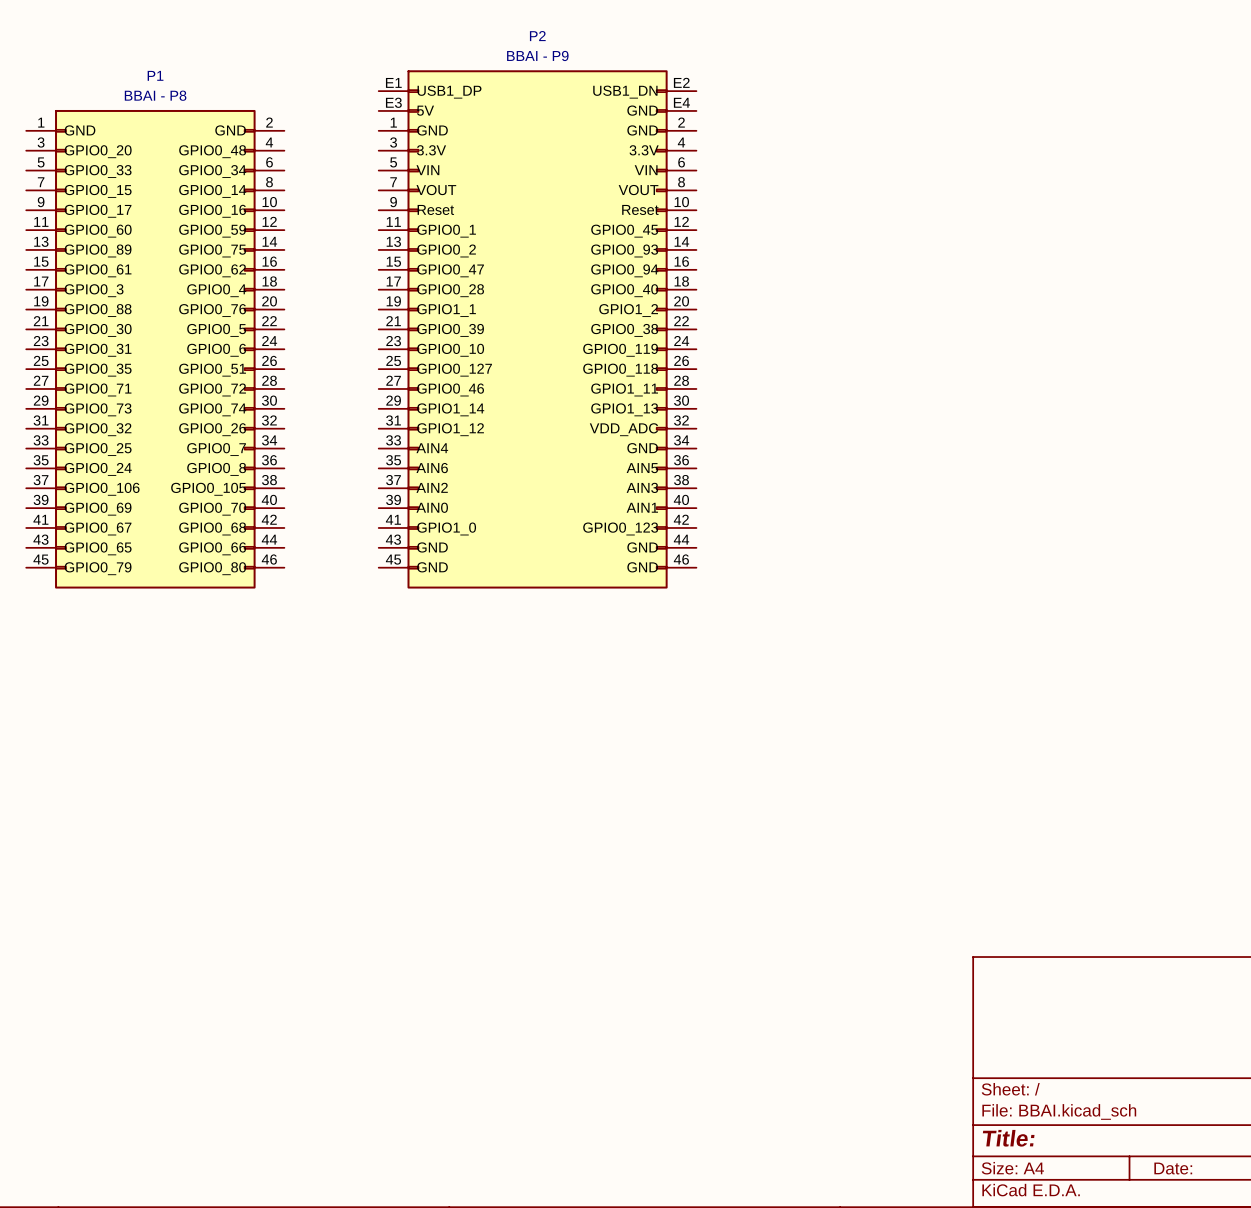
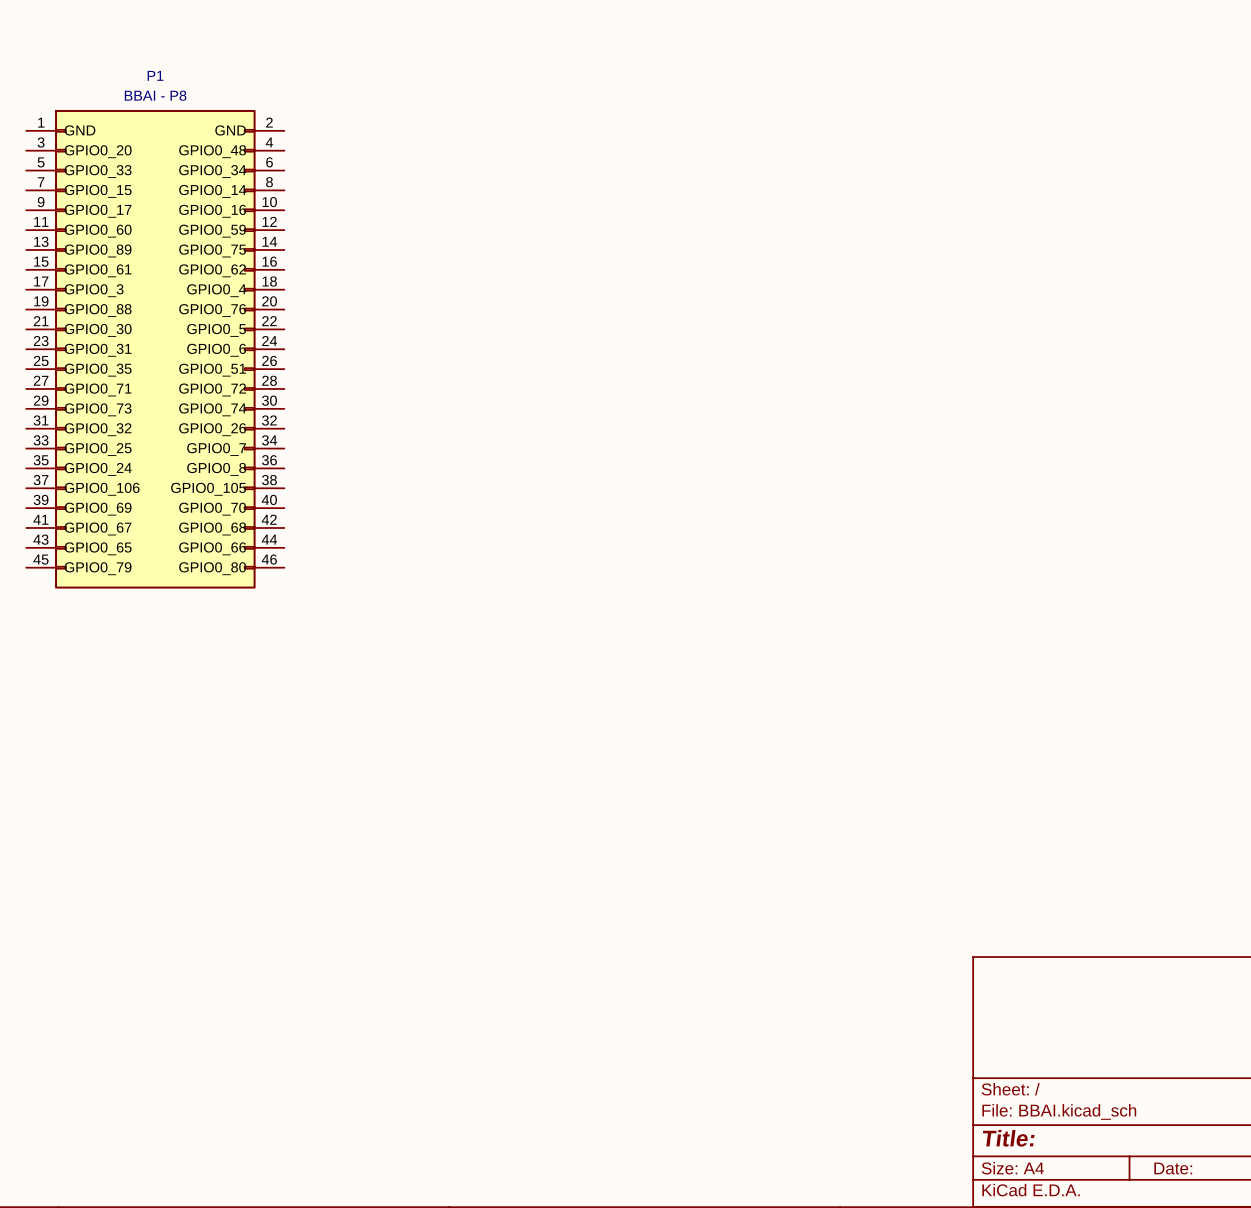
P2: BBAI - P9 (537, 329) -> none

